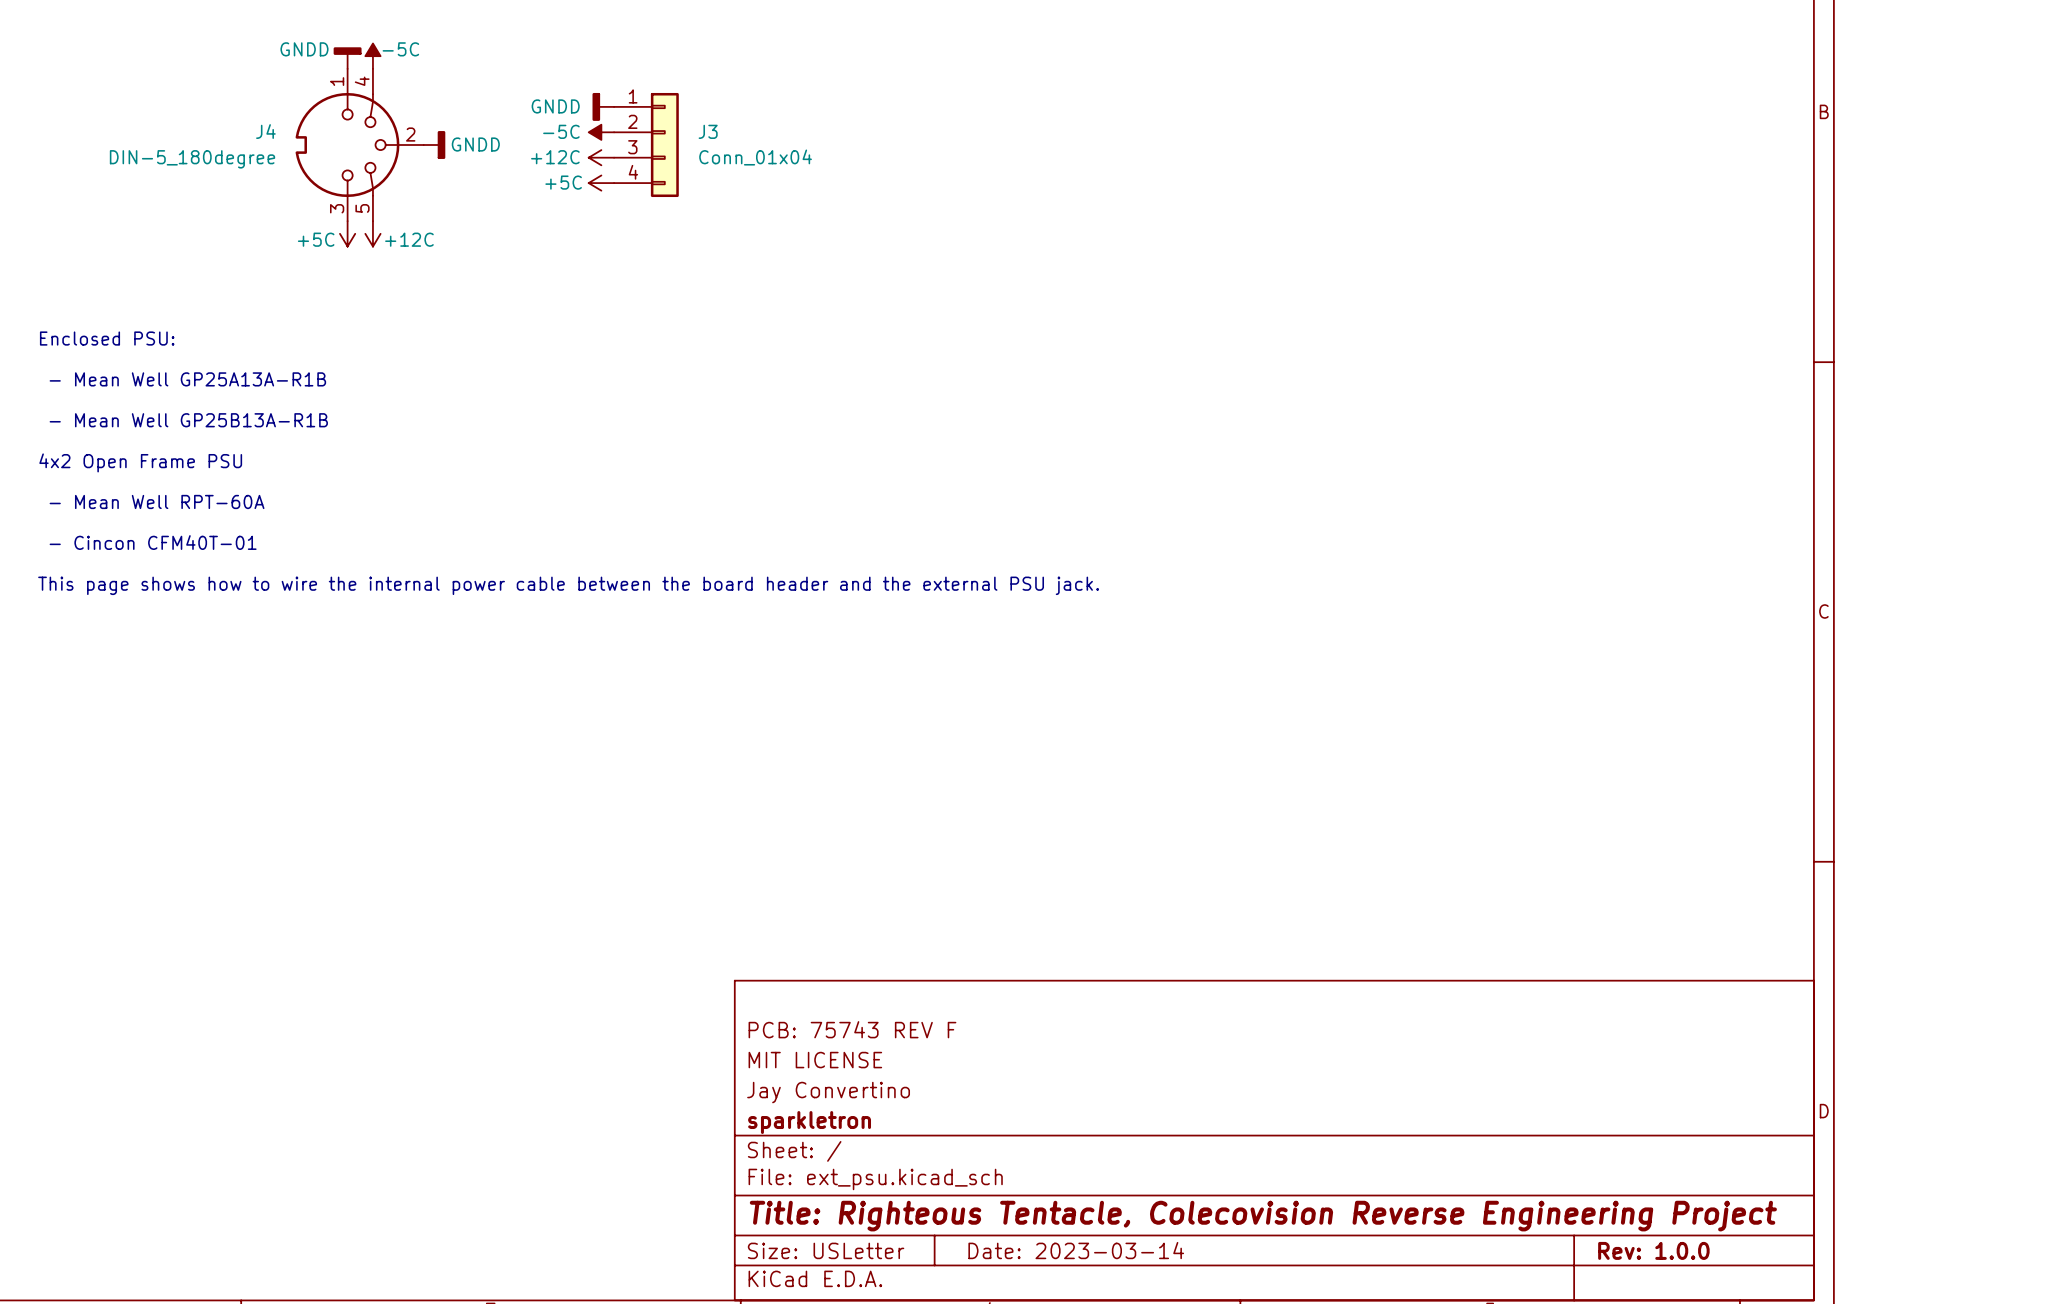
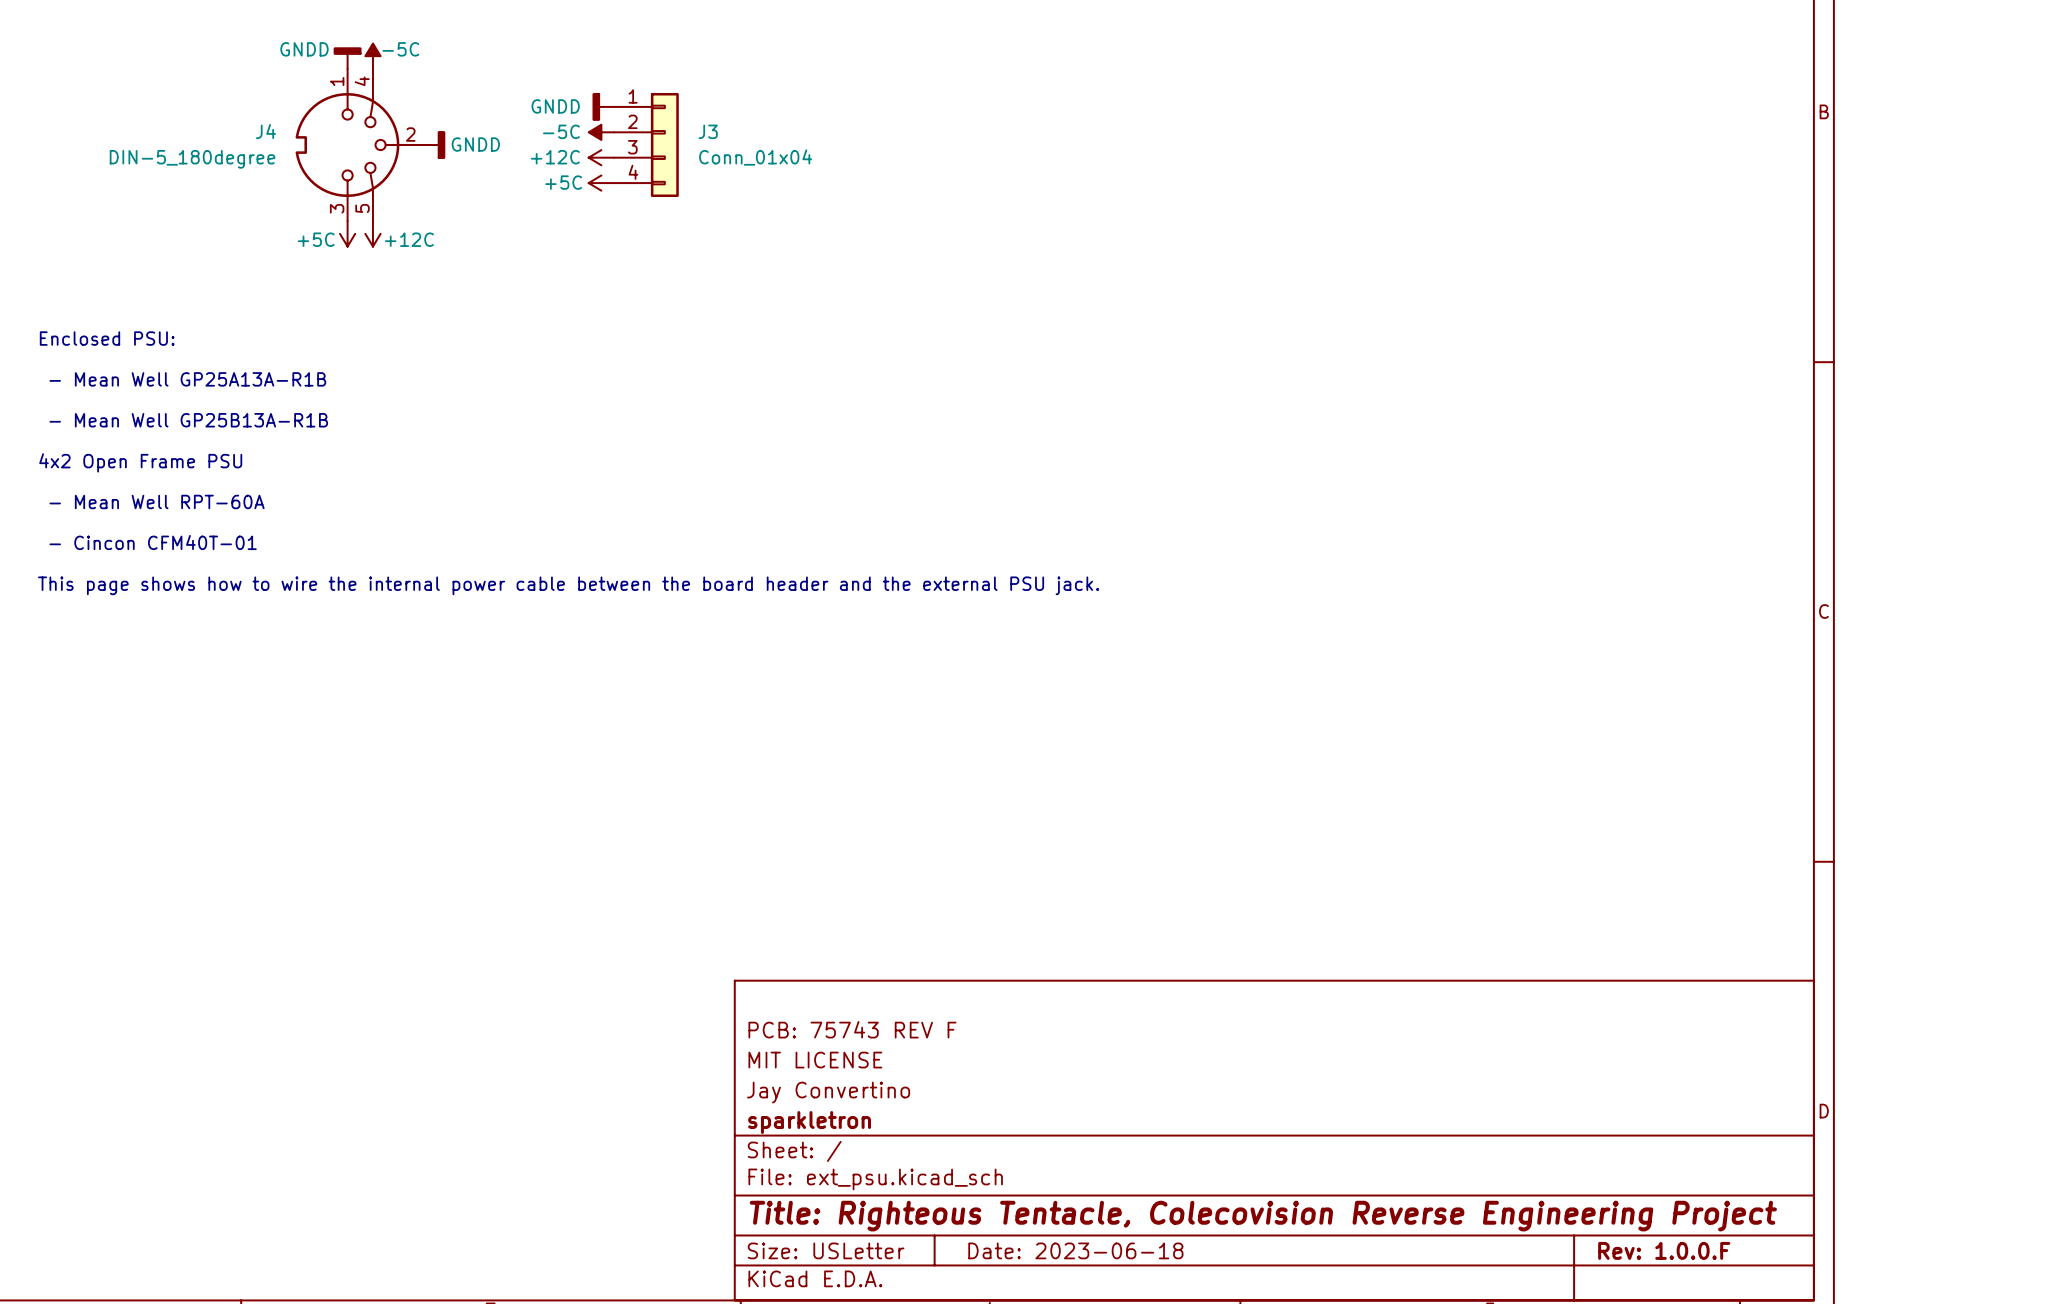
title block: Date: 2023-03-14 (1076, 1250) -> Date: 2023-06-18 (1075, 1250)
title block: Rev: 1.0.0 (1653, 1250) -> Rev: 1.0.0.F (1664, 1250)

